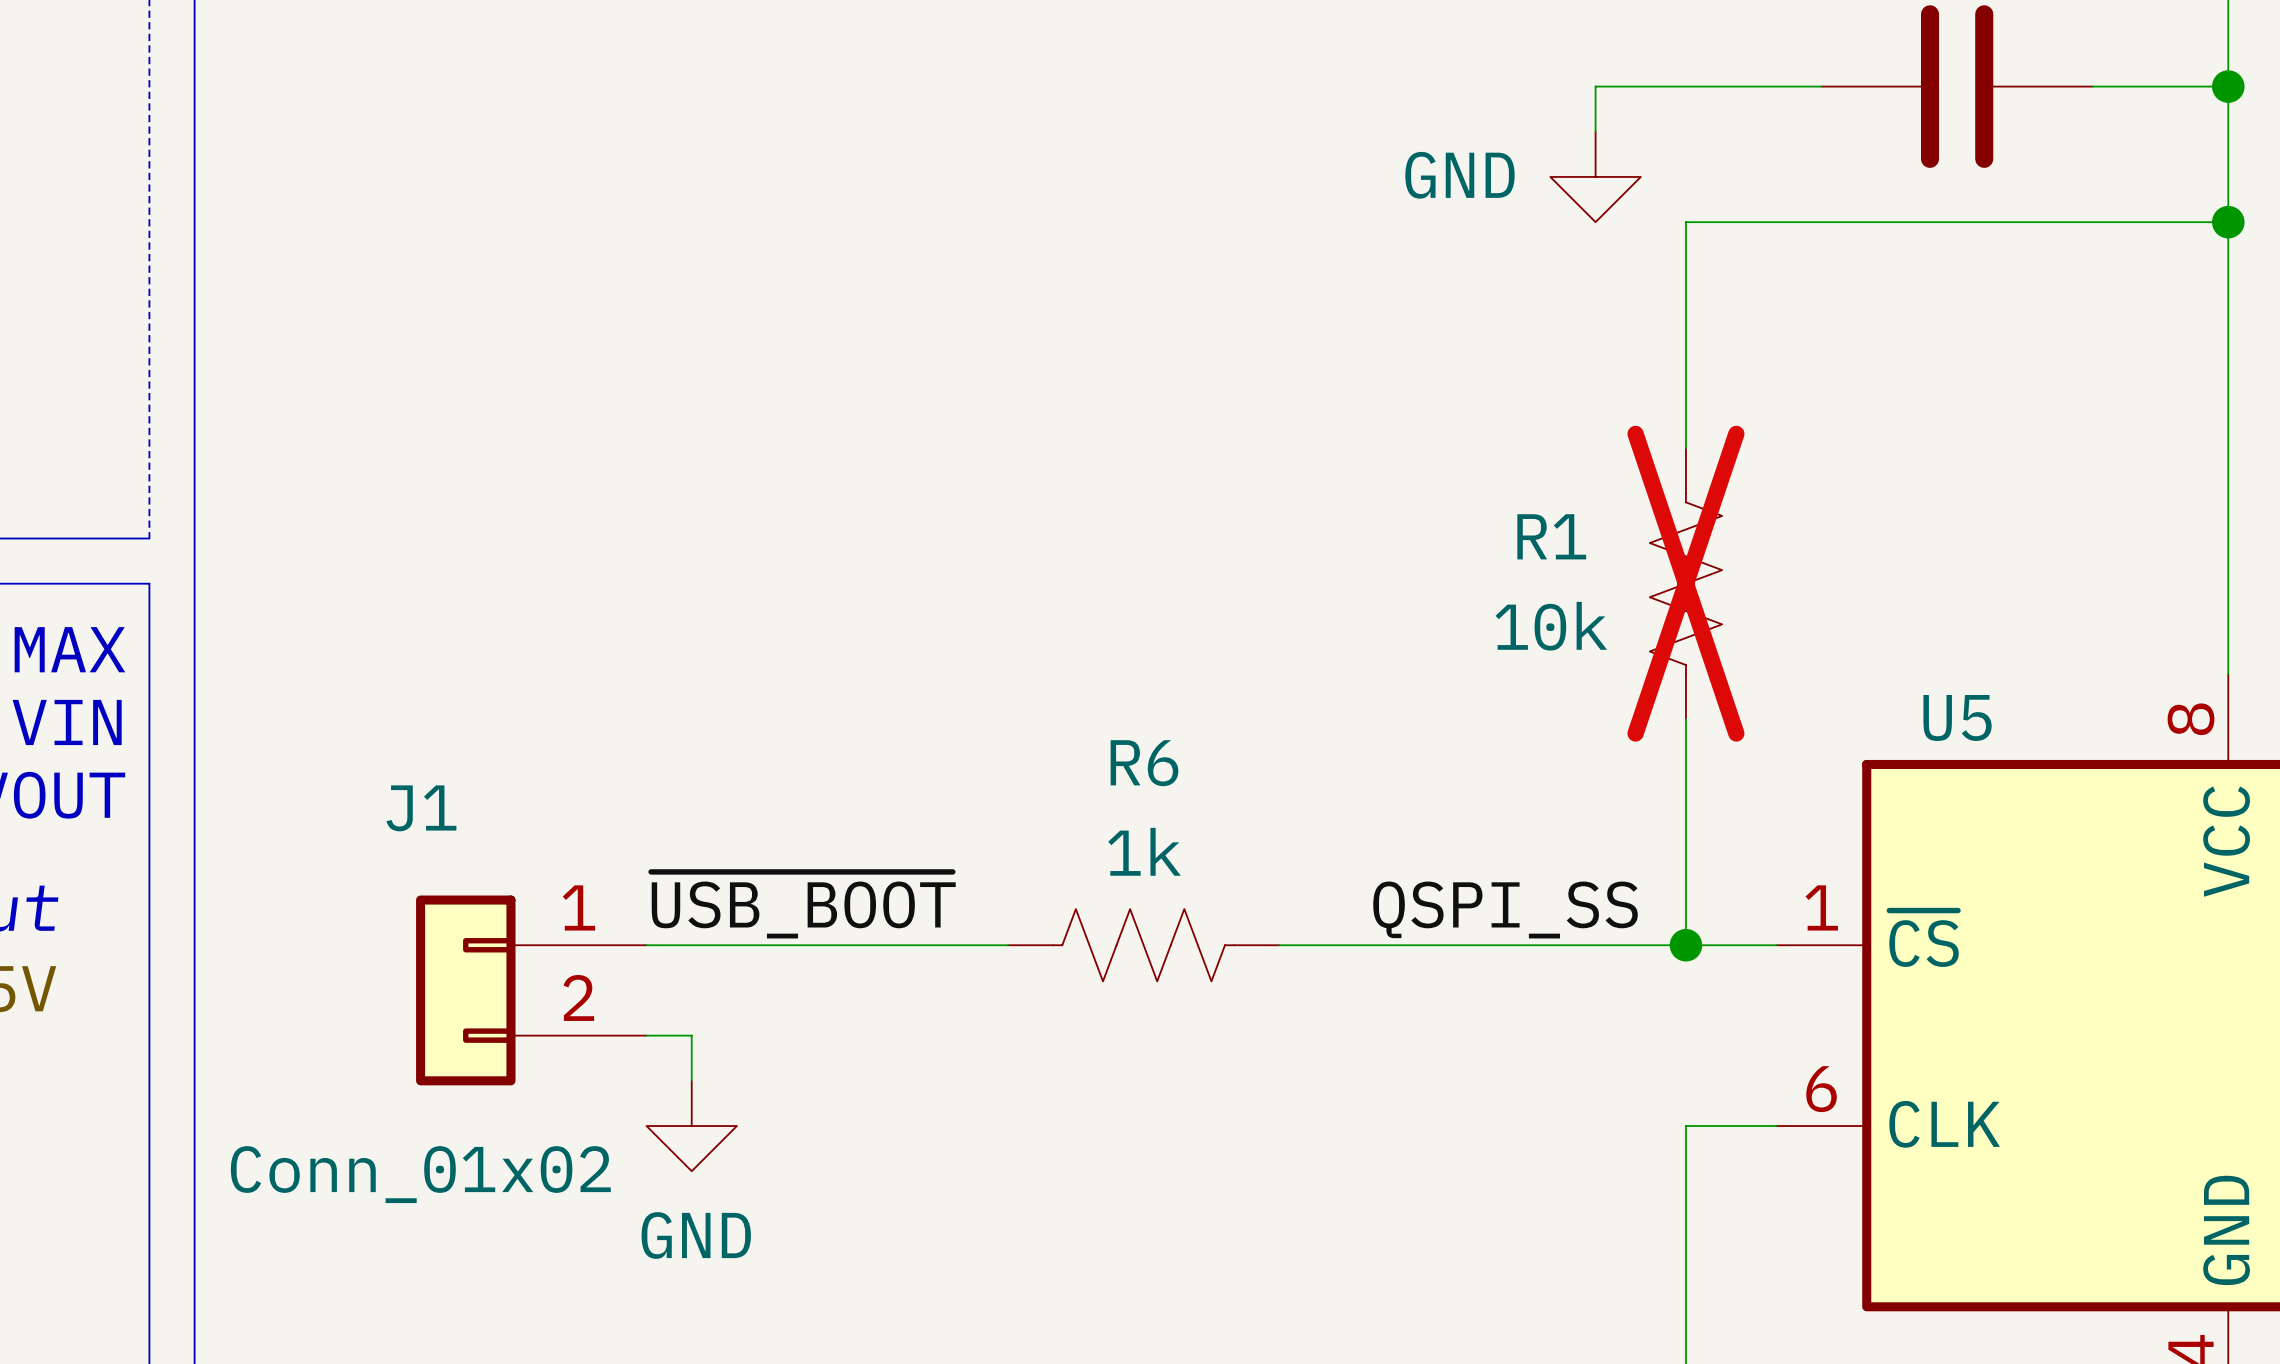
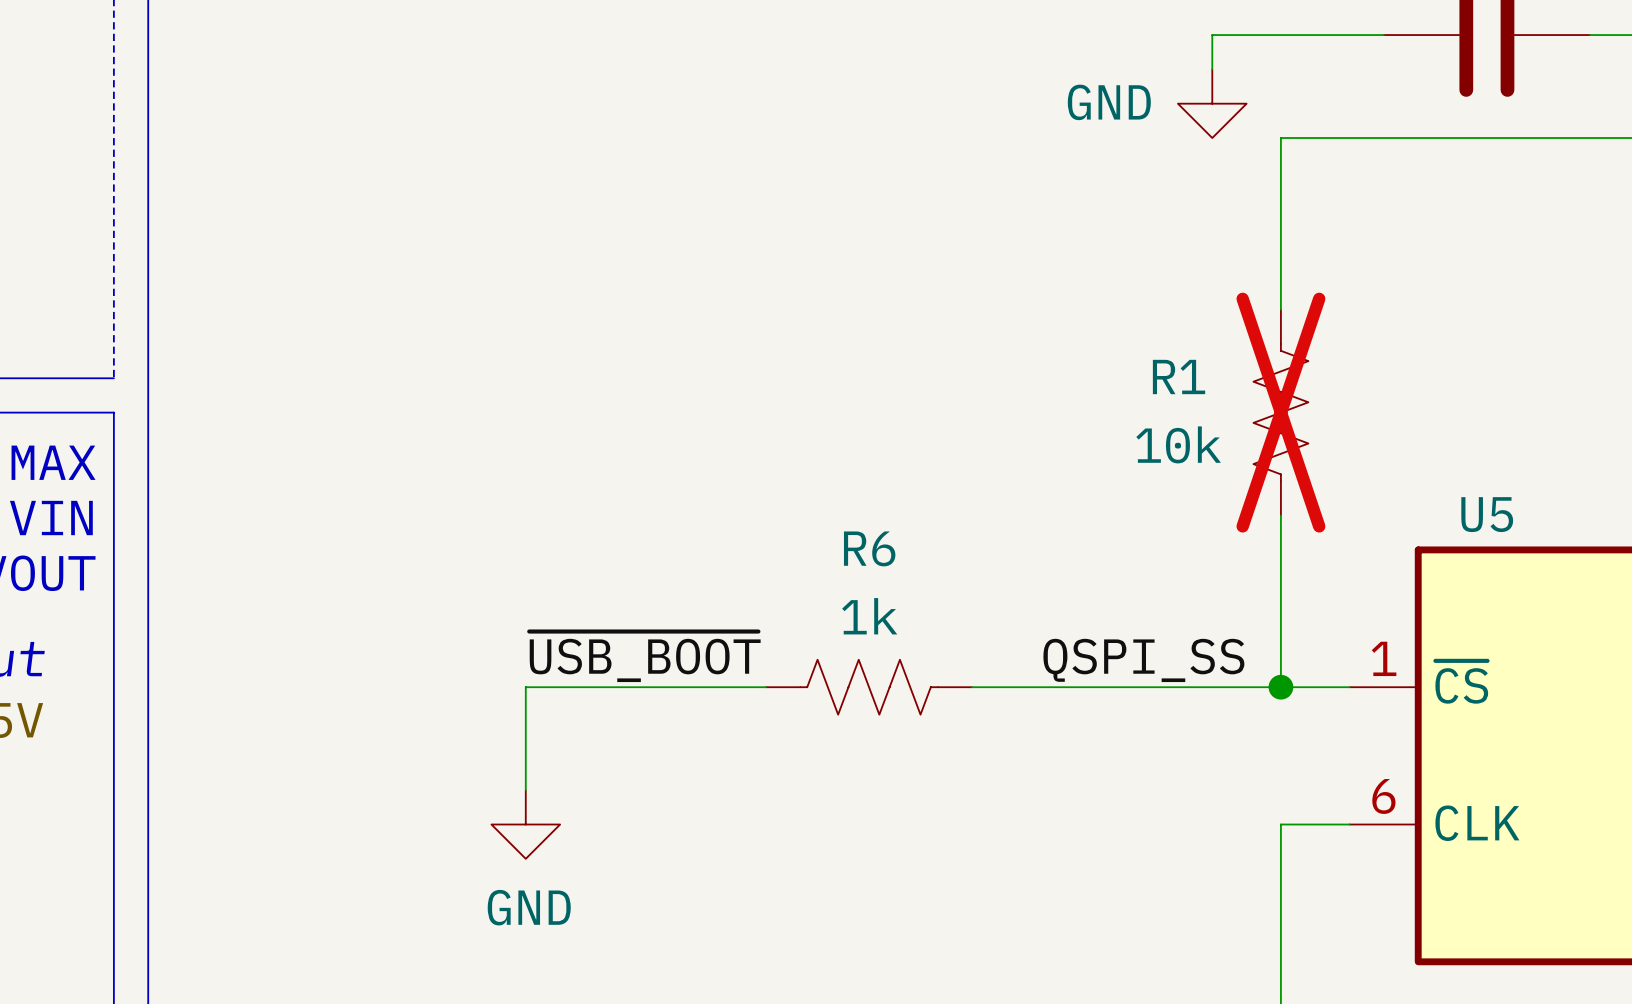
label position: ~{USB_BOOT} (803, 905) -> ~{USB_BOOT} (644, 656)
wire: (646, 945) (691, 945) -> (525, 755) (525, 687)
J1: Conn_01x02 (531, 990) -> none
wire: (646, 1035) (691, 1035) -> none

